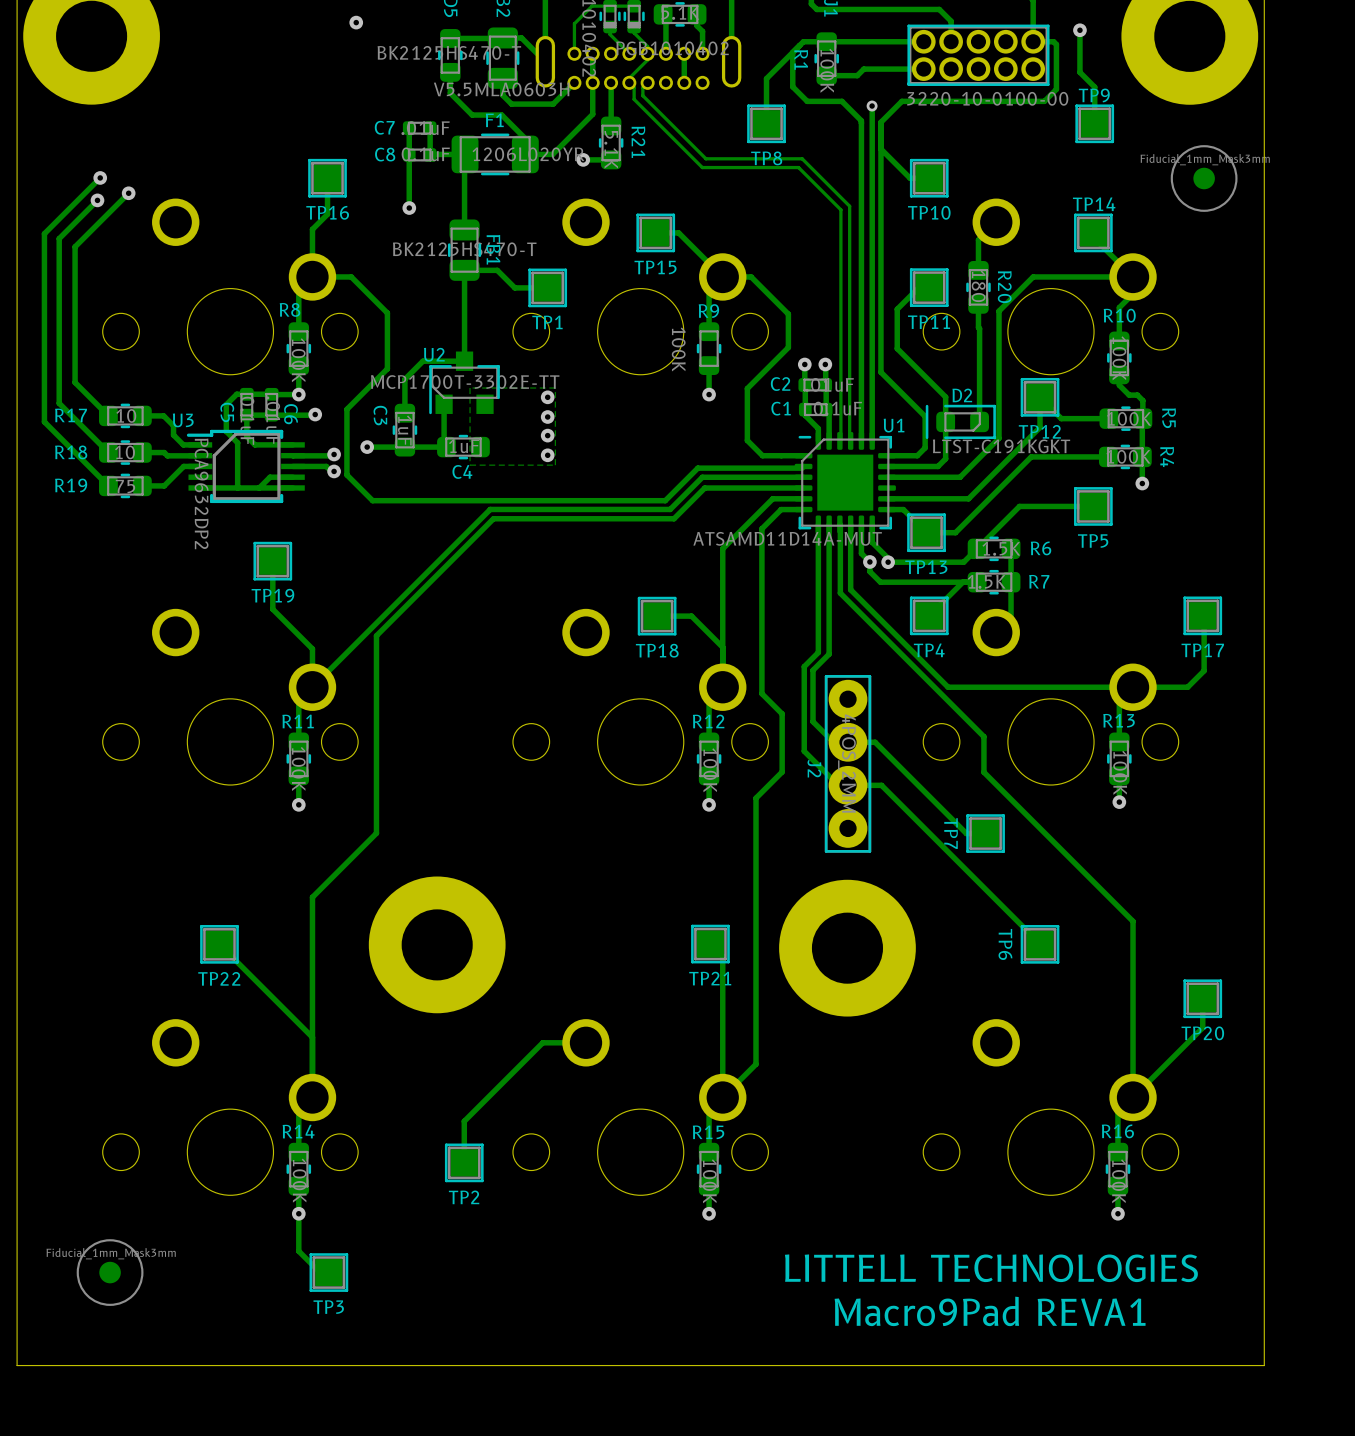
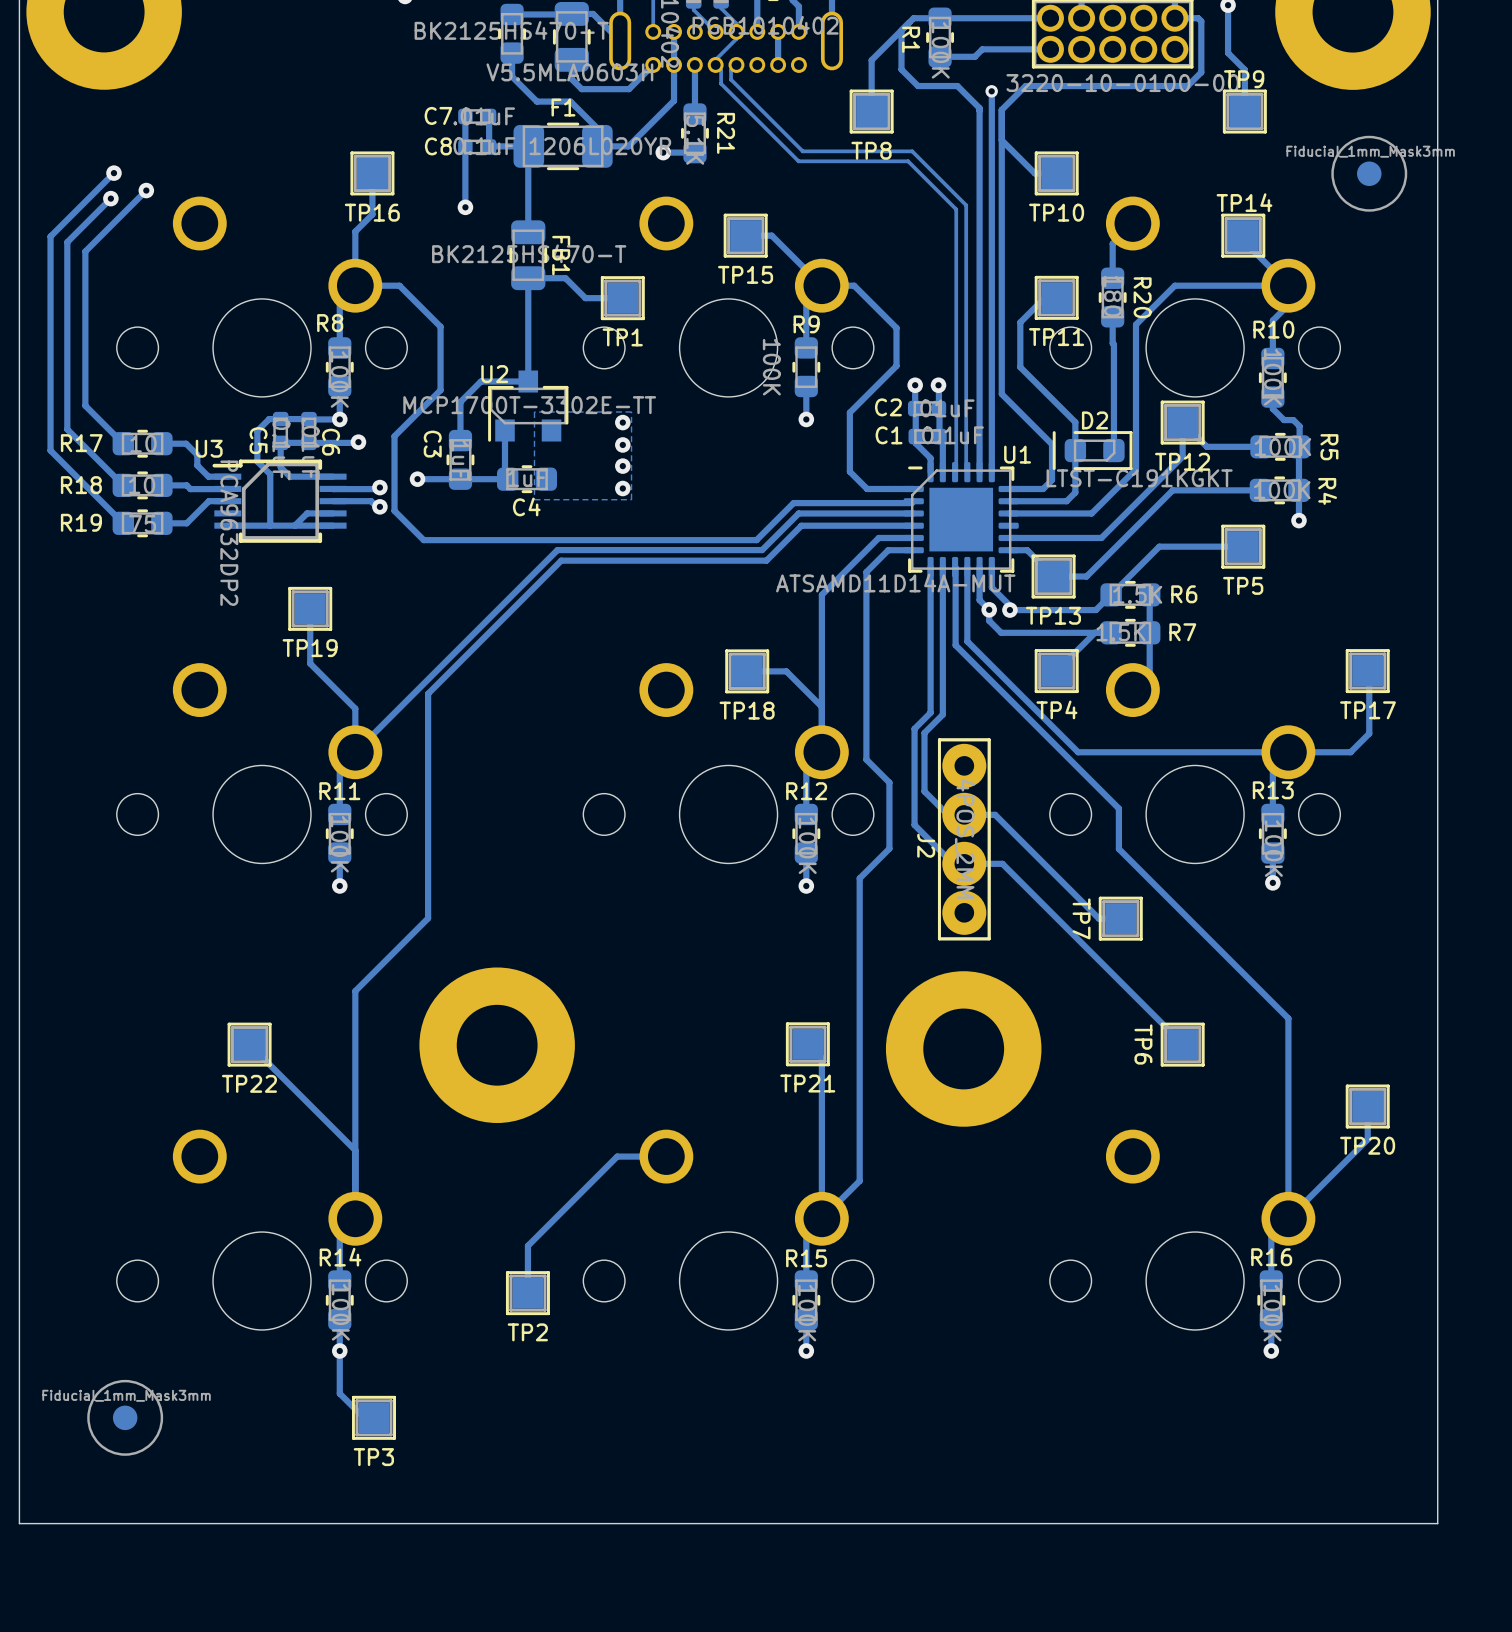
text: LITTELL TECHNOLOGIES (991, 1268) -> none
text: Macro9Pad REVA1 (990, 1311) -> none

